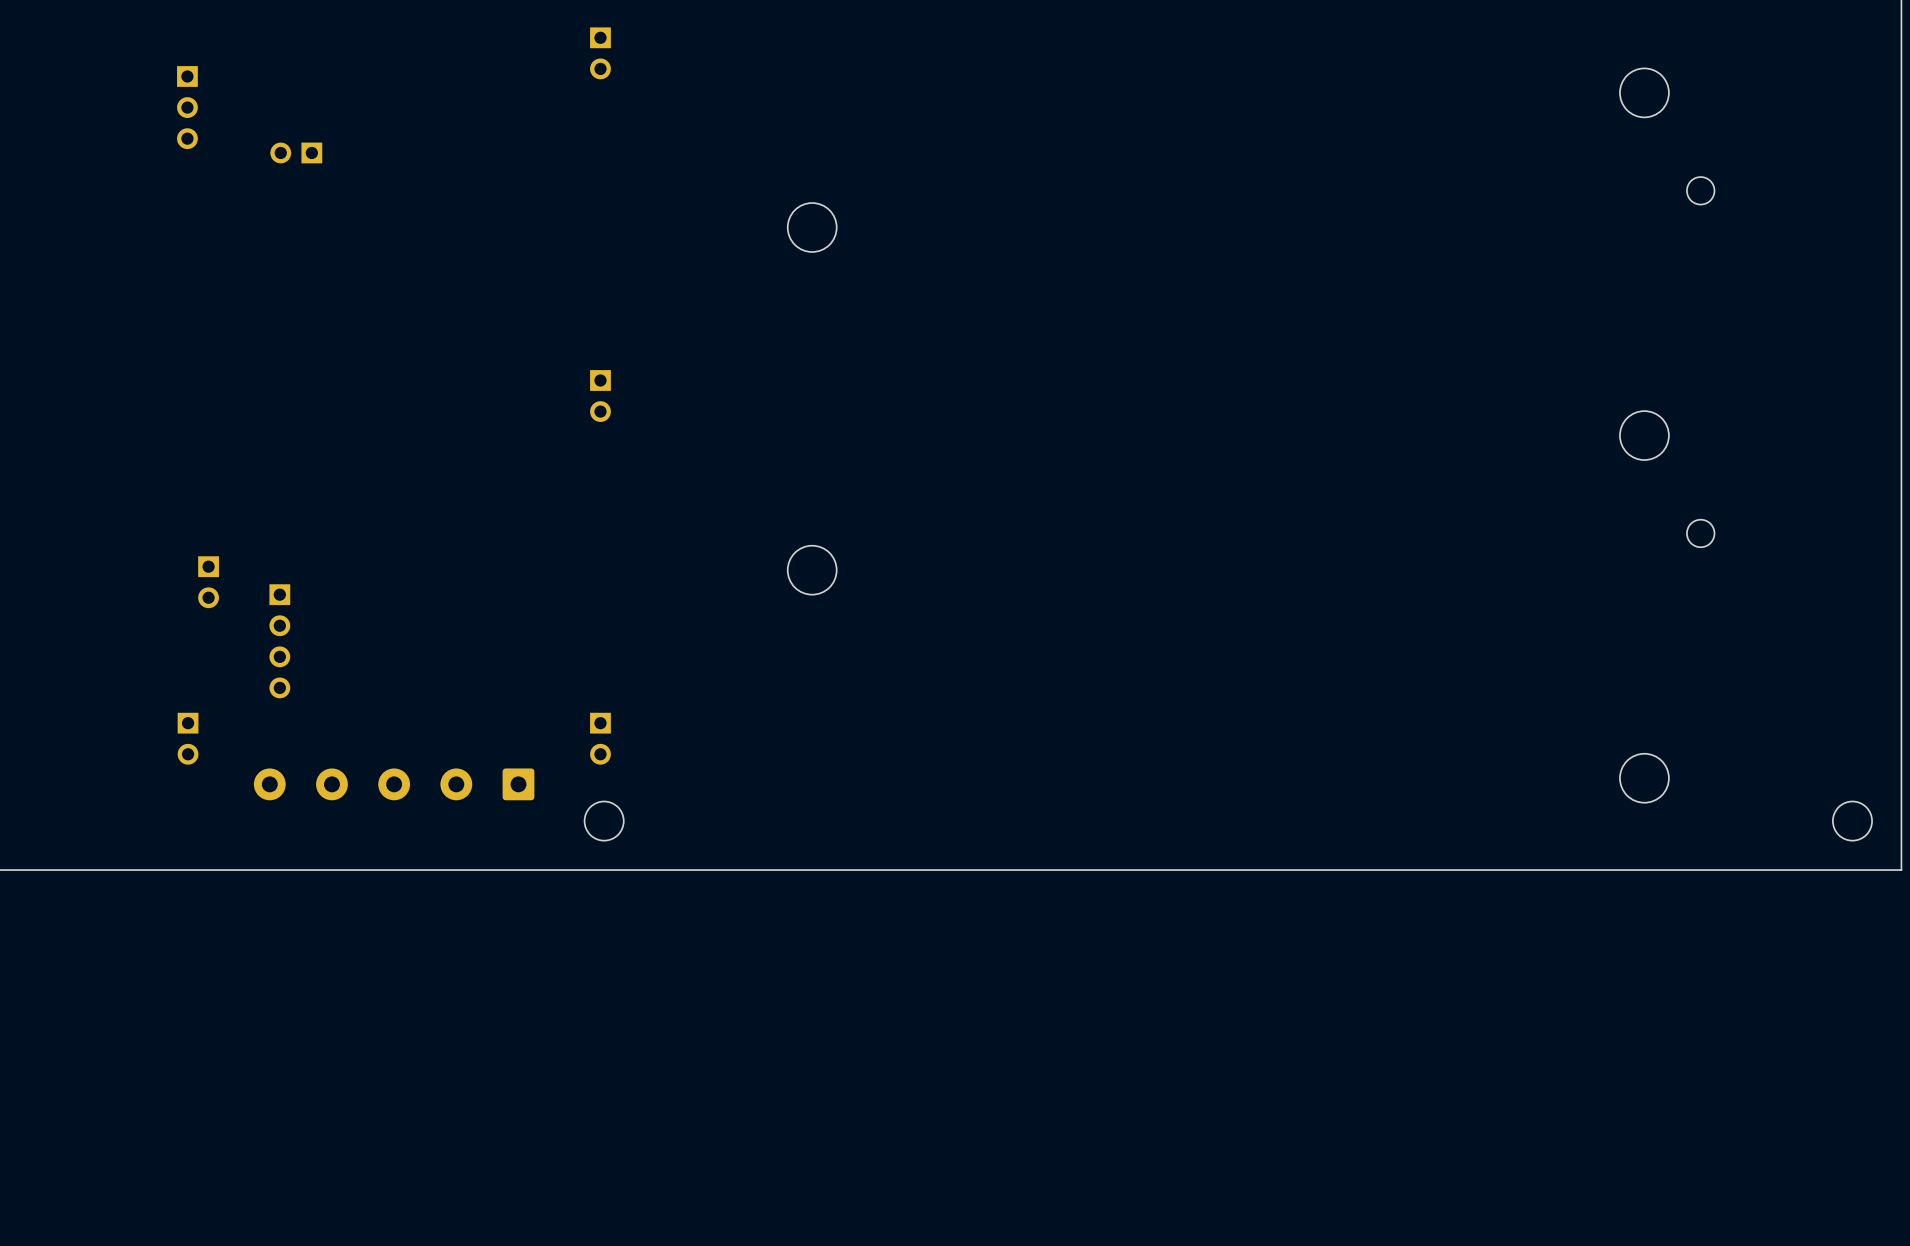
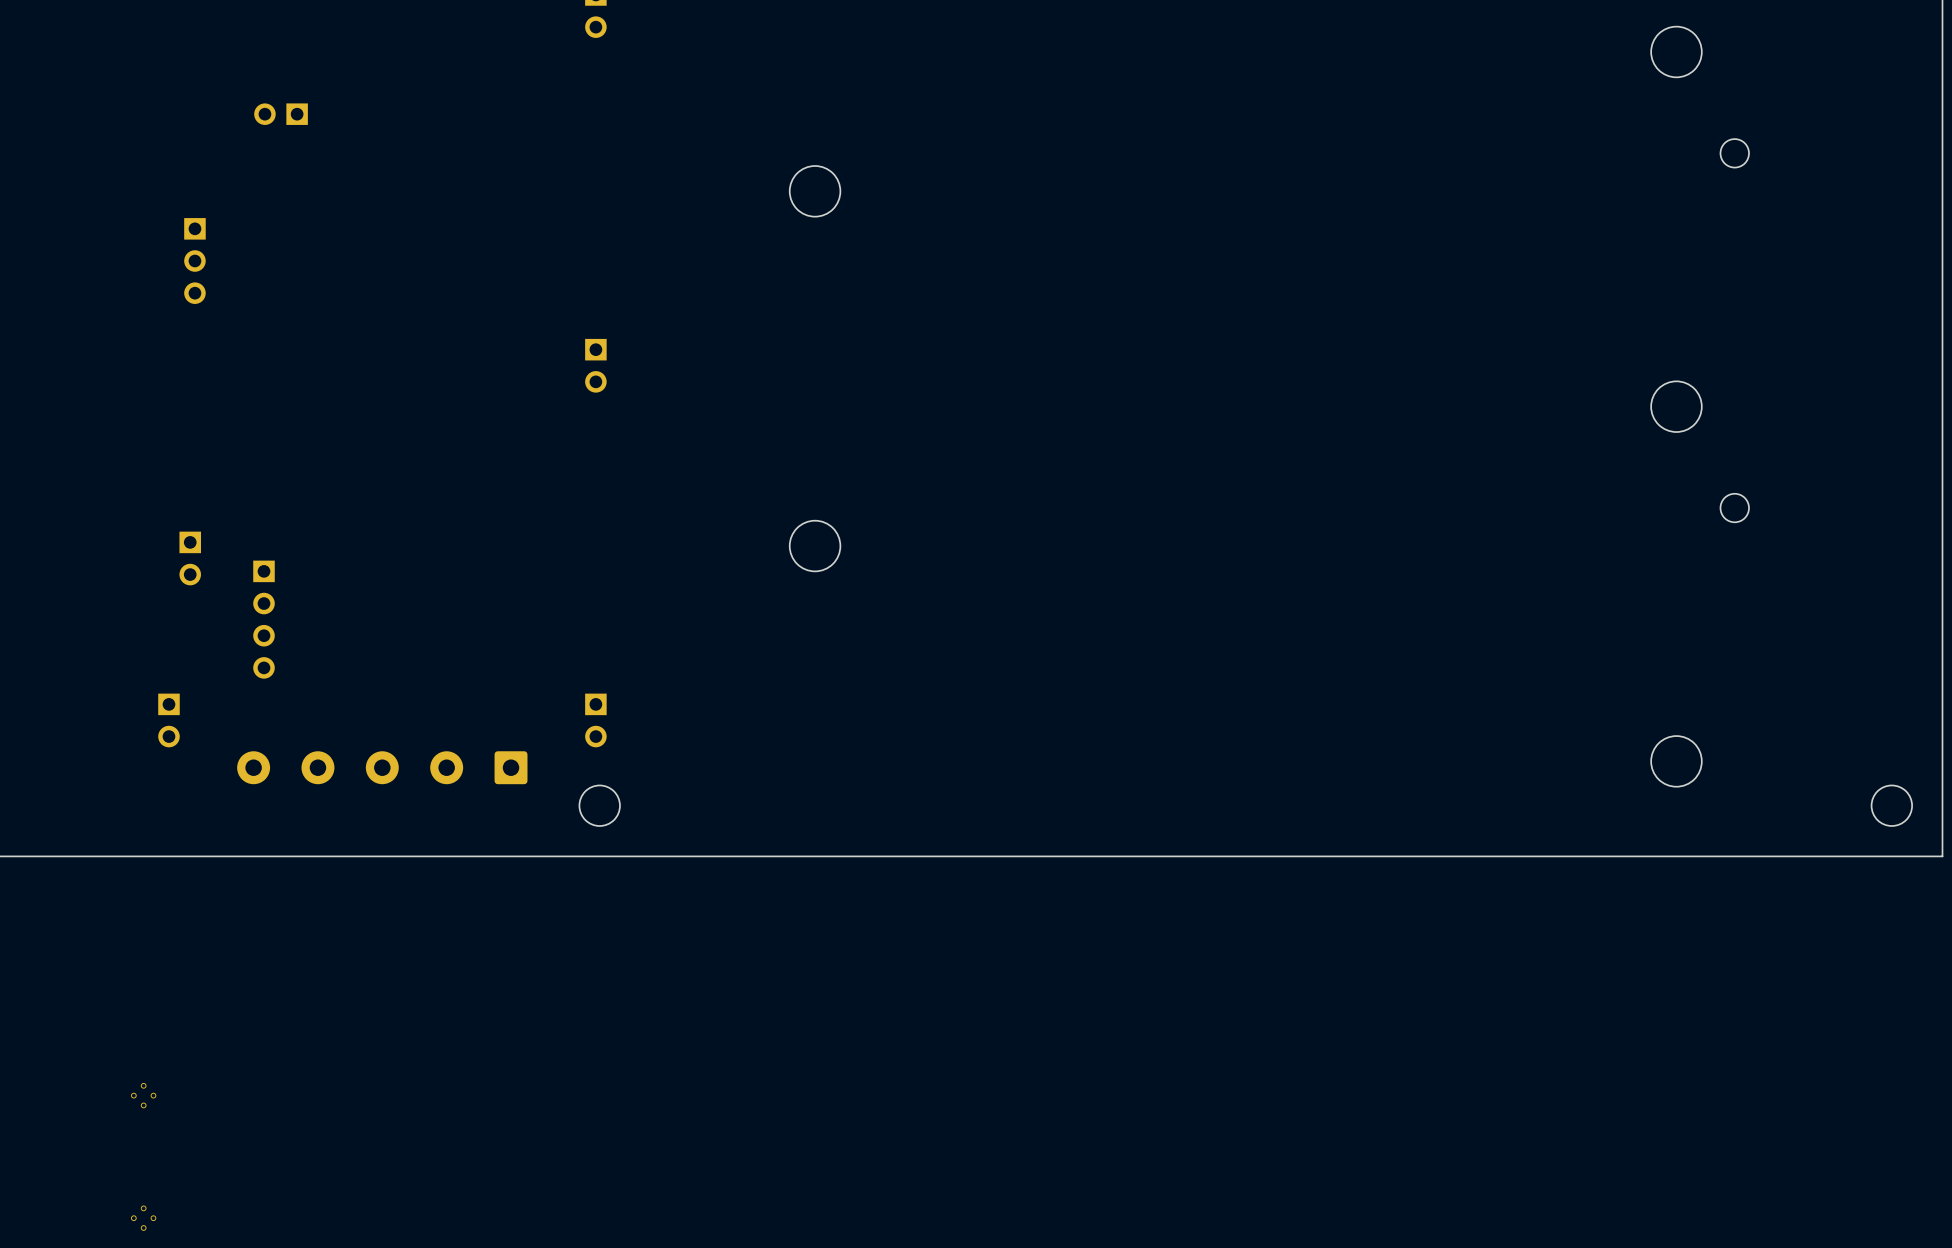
part position: (187, 107) -> (194, 261)
part: none -> (143, 1095)
part: none -> (143, 1218)

